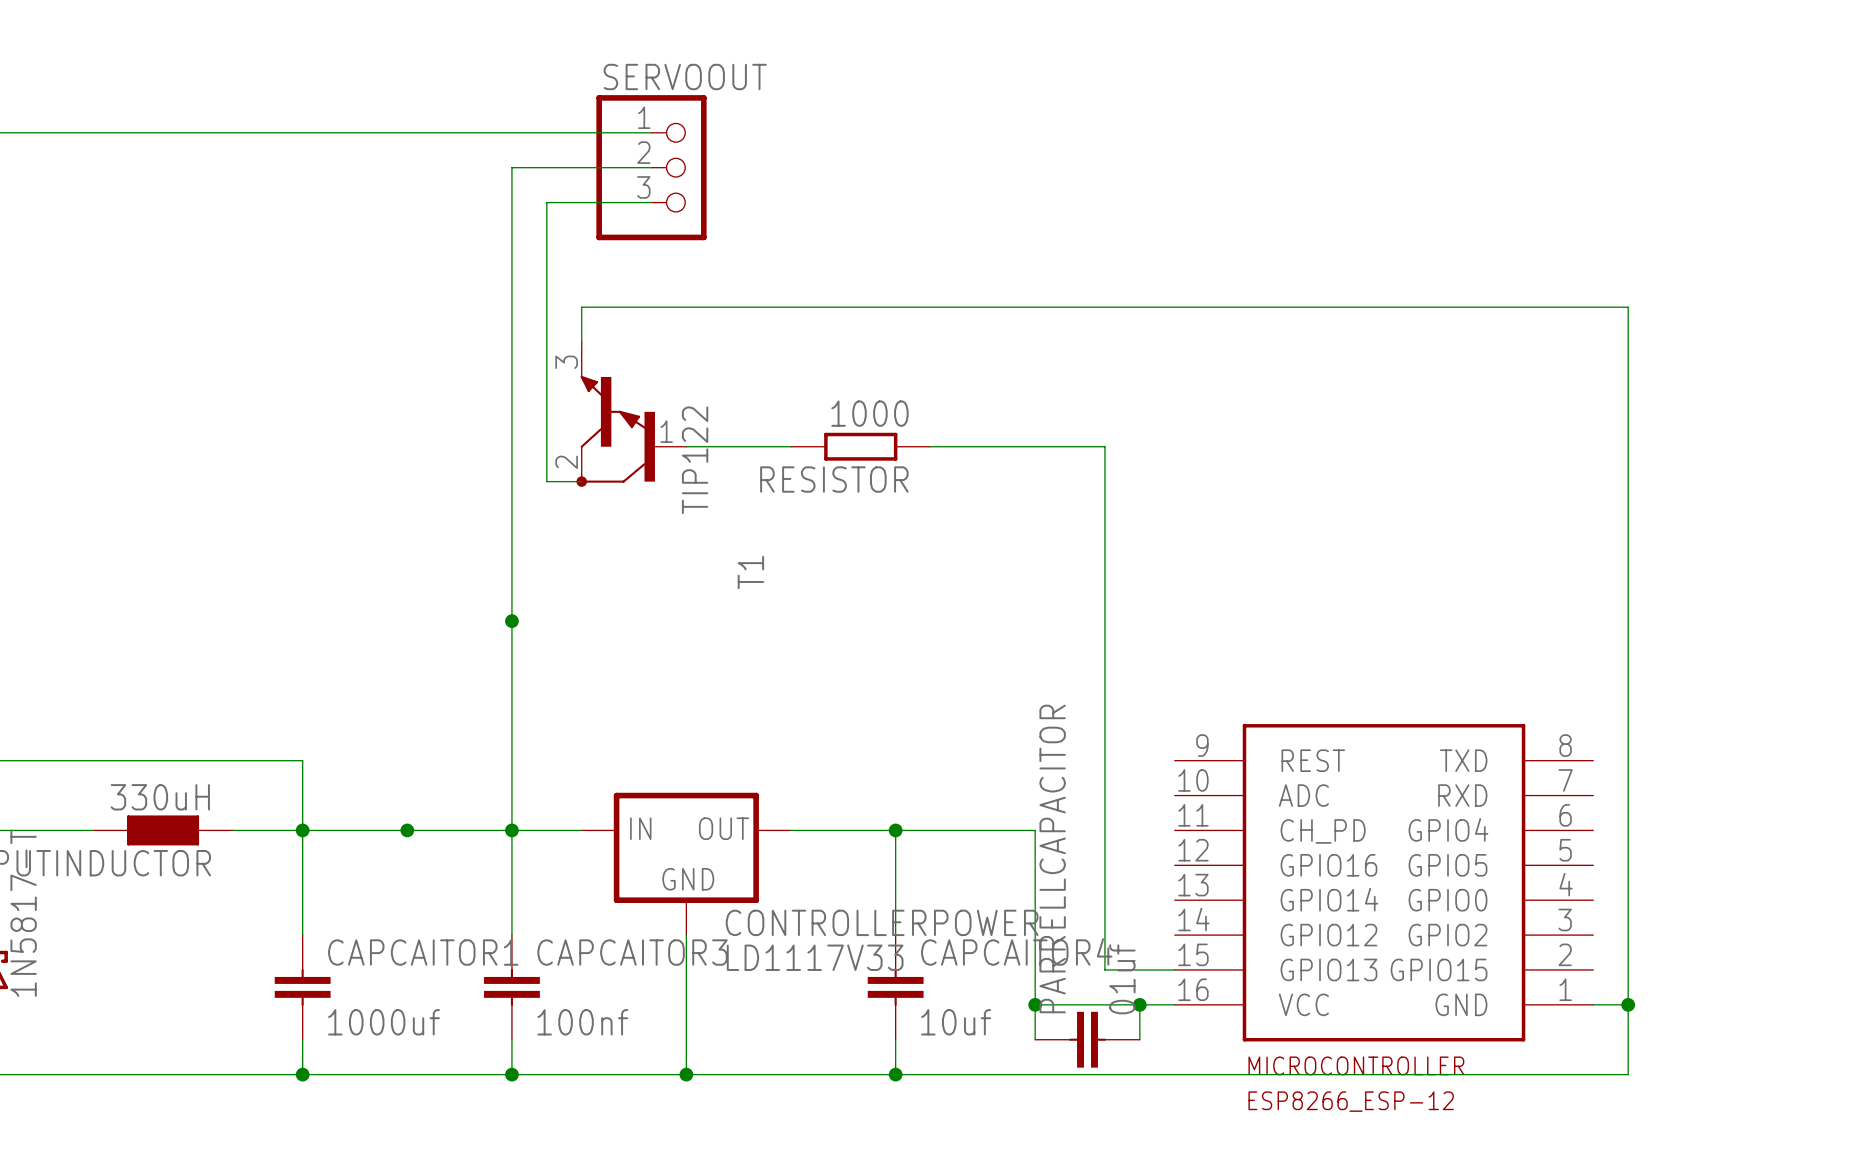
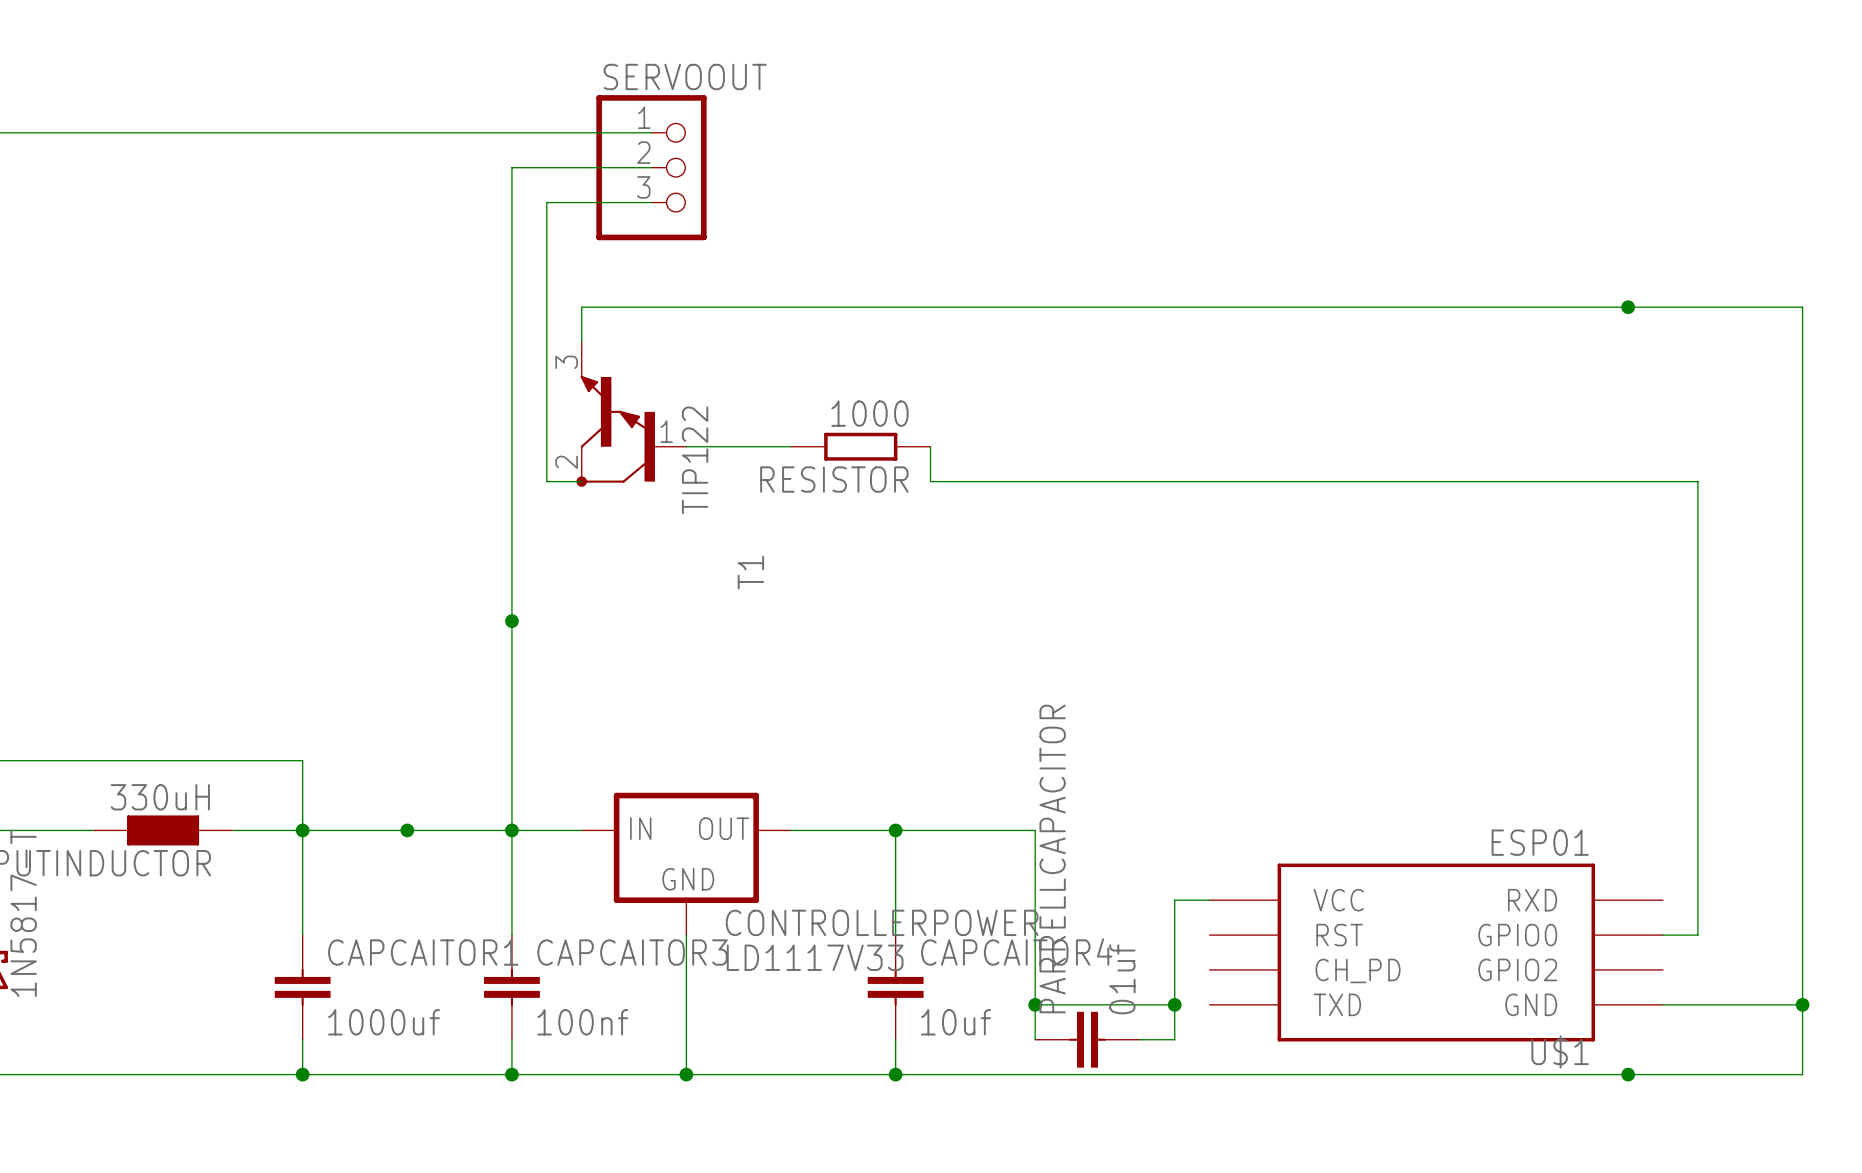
wire: (1628, 307) (1628, 1074) -> (1628, 307) (1802, 307) (1802, 1074) (1628, 1074)
junction: none -> (1628, 307)
wire: (930, 446) (1104, 446) (1104, 969) (1174, 969) -> (930, 446) (930, 481) (1697, 481) (1697, 935) (1663, 935)
MICROCONTROLLER: (1384, 882) -> none
U$1: none -> ESP01 (1436, 952)
wire: (1139, 1004) (1139, 1039) -> (1209, 900) (1174, 900) (1174, 1039) (1139, 1039)
junction position: (1139, 1004) -> (1174, 1004)
junction position: (1628, 1004) -> (1628, 1074)
wire: none -> (1663, 1004) (1802, 1004)
junction: none -> (1802, 1004)

